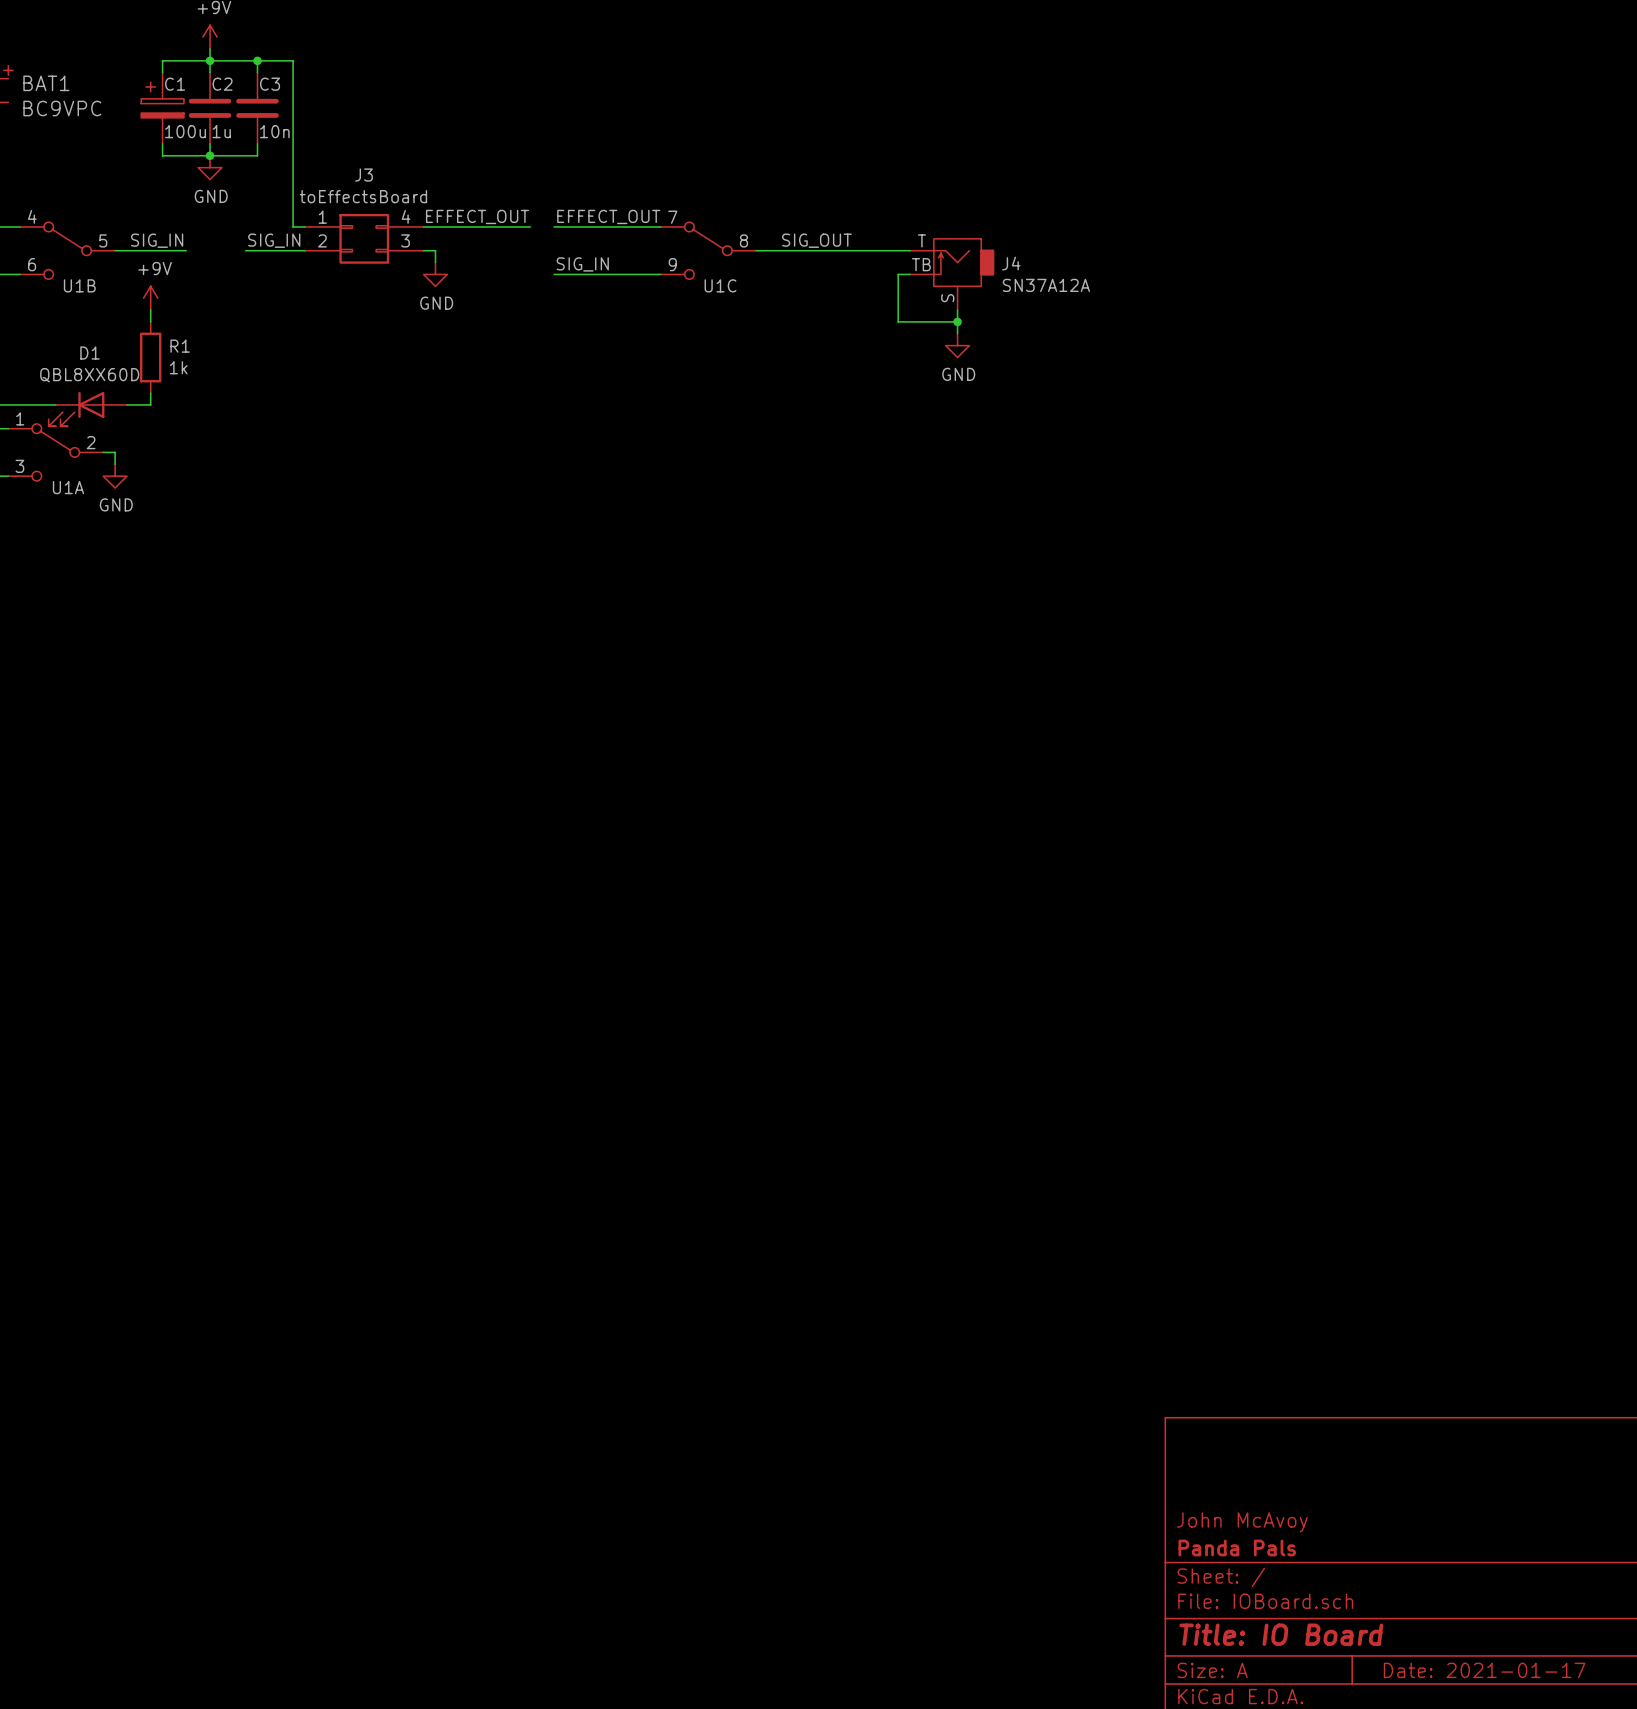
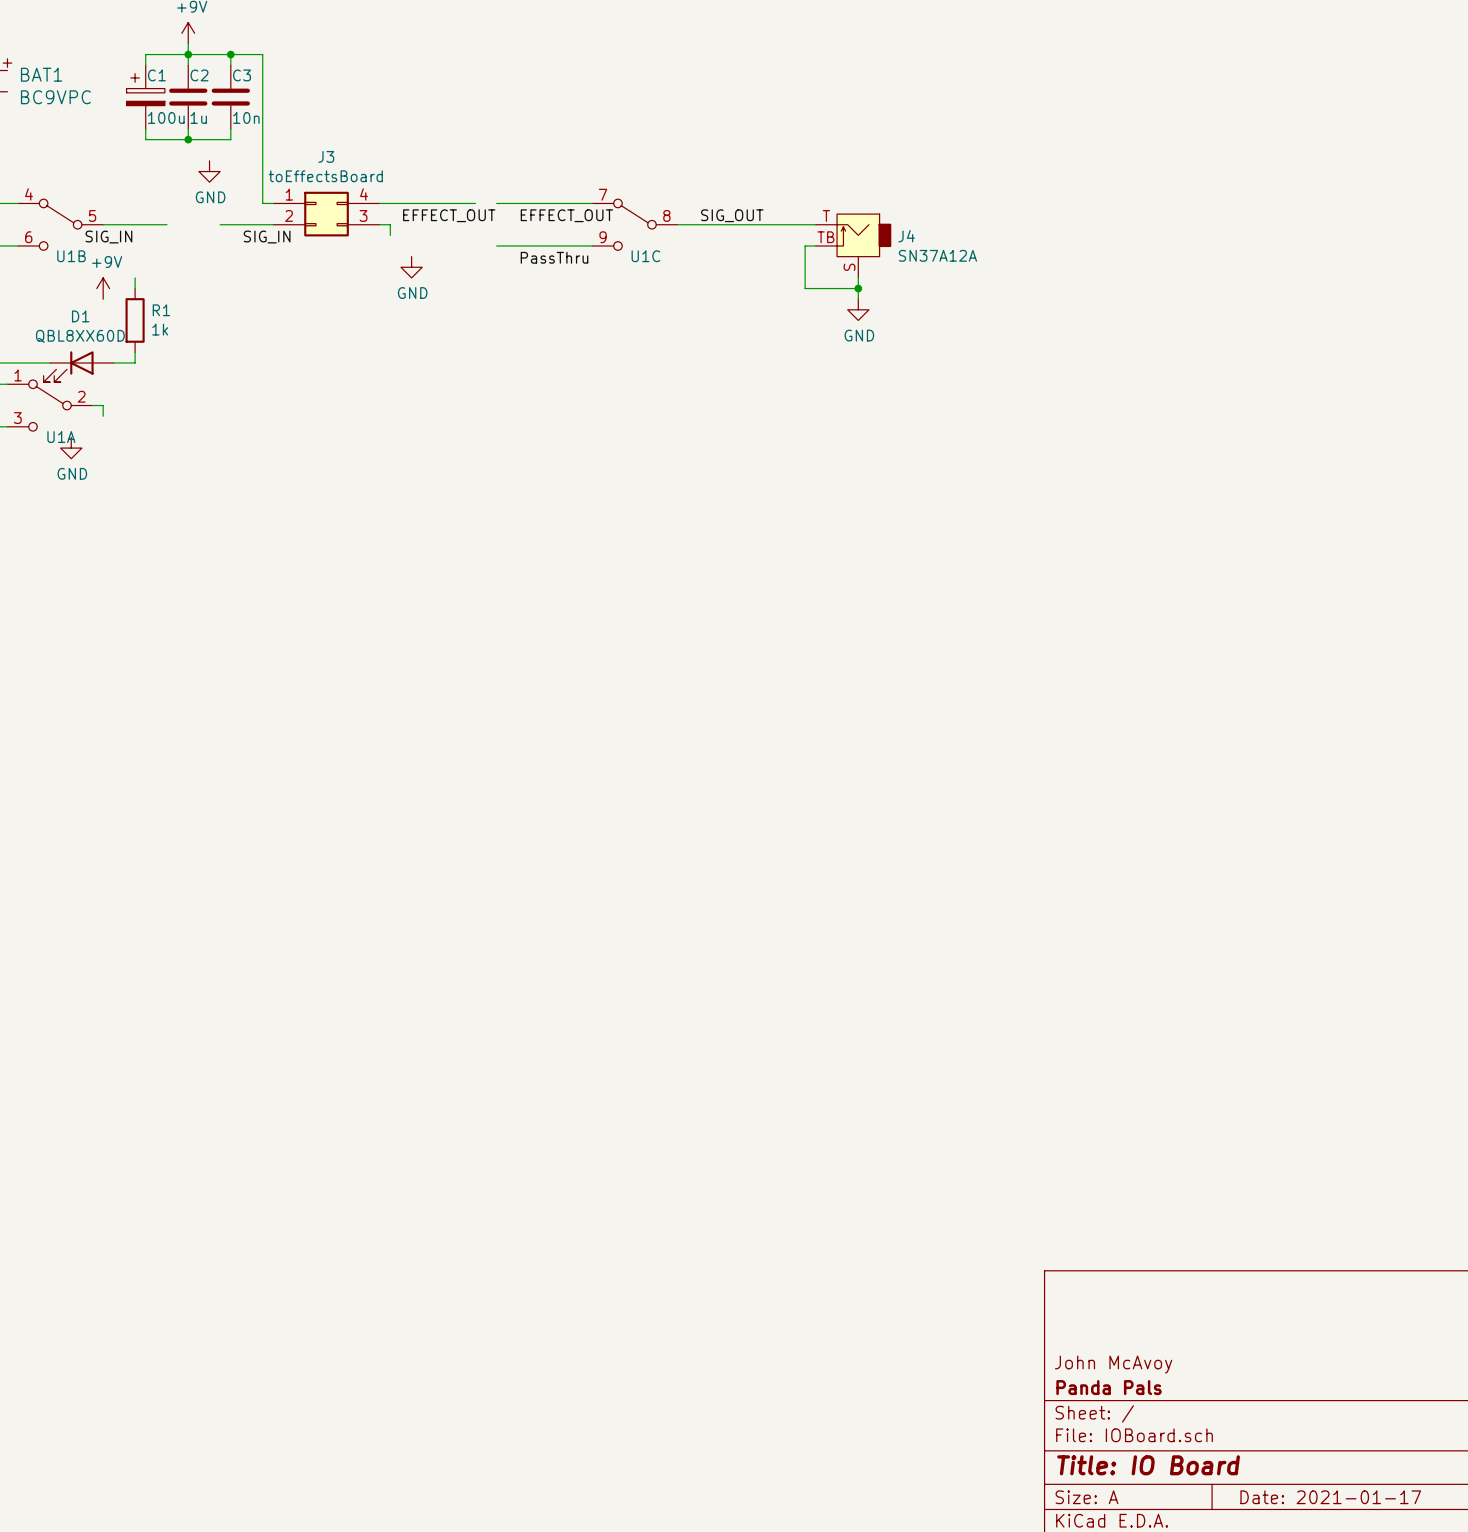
power symbol position: GND (210, 167) -> GND (209, 171)
label: EFFECT_OUT (477, 216) -> none
label: EFFECT_OUT (608, 216) -> none
label position: SIG_IN (157, 240) -> SIG_IN (108, 237)
label position: SIG_IN (274, 240) -> SIG_IN (267, 237)
label: none -> EFFECT_OUT (449, 215)
label: none -> EFFECT_OUT (566, 215)
label: SIG_IN (582, 264) -> none
power symbol position: GND (435, 274) -> GND (411, 267)
label: none -> PassThru (554, 257)
power symbol position: +9V (150, 298) -> +9V (103, 288)
power symbol position: GND (115, 476) -> GND (71, 448)

